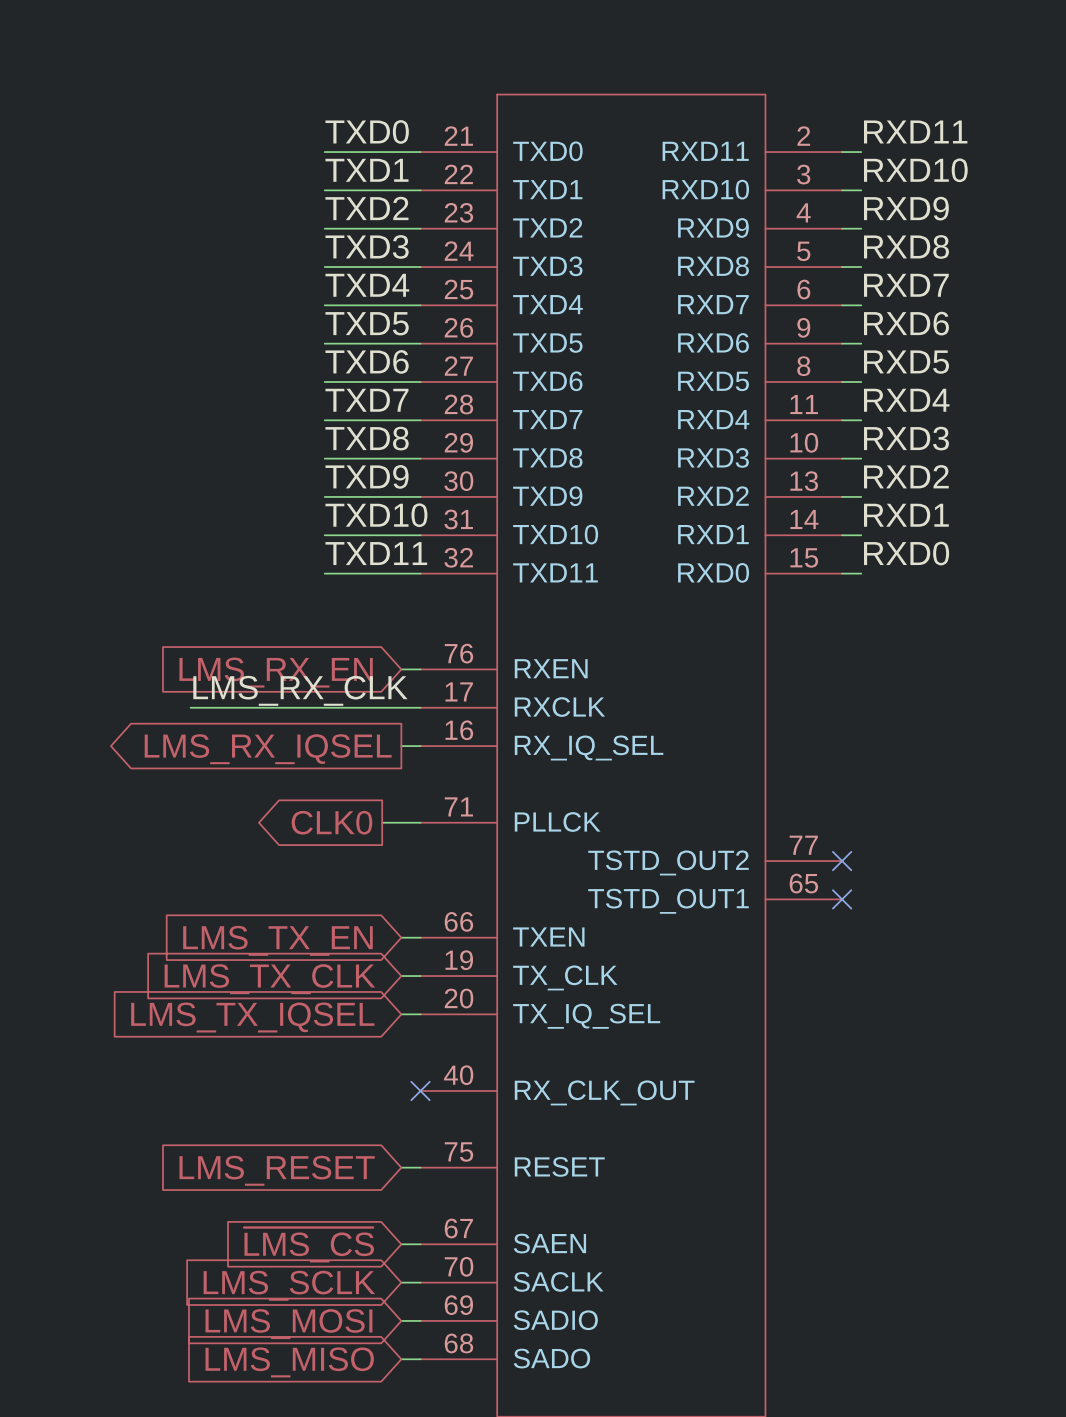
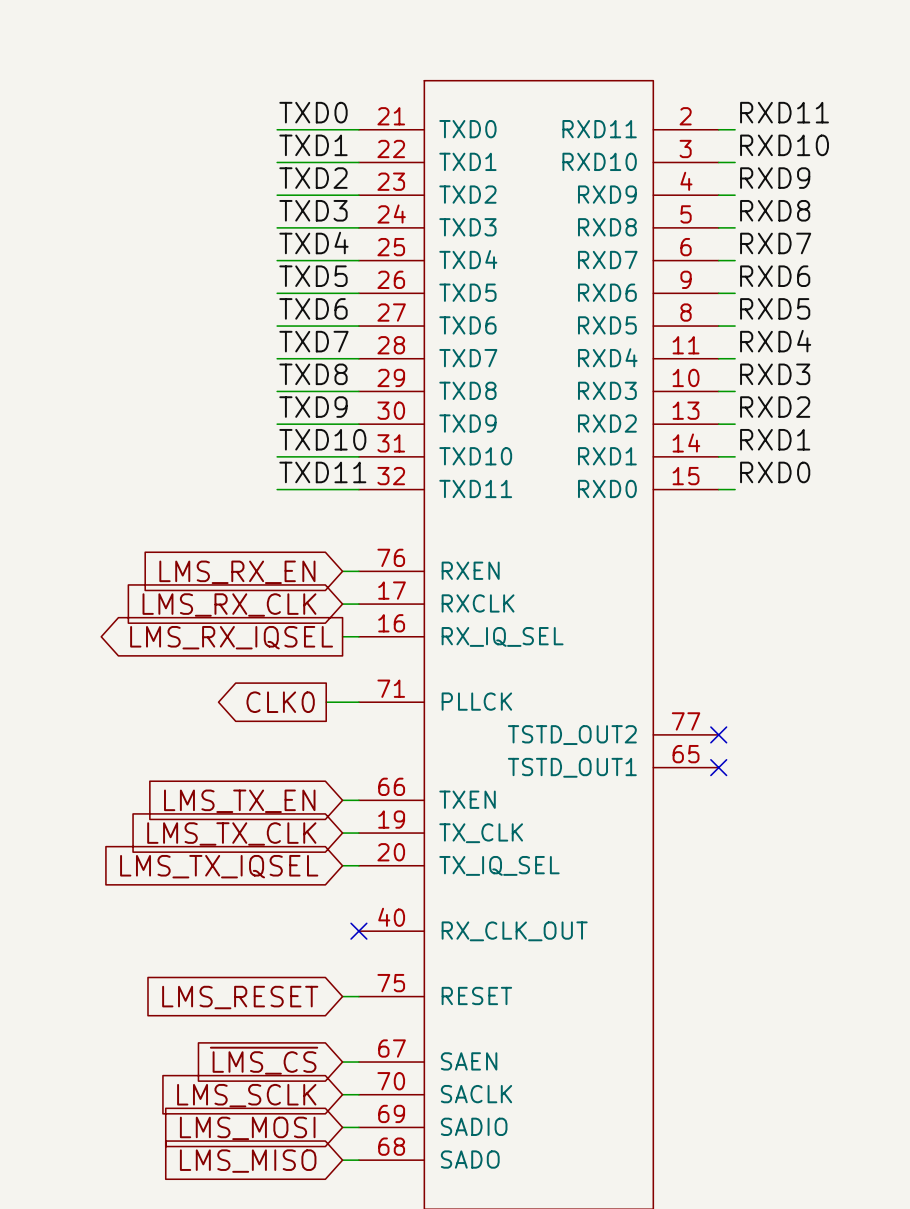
label: LMS_RX_CLK (300, 690) -> none
wire: (190, 707) (401, 707) -> none
global label: none -> LMS_RX_CLK (229, 605)

